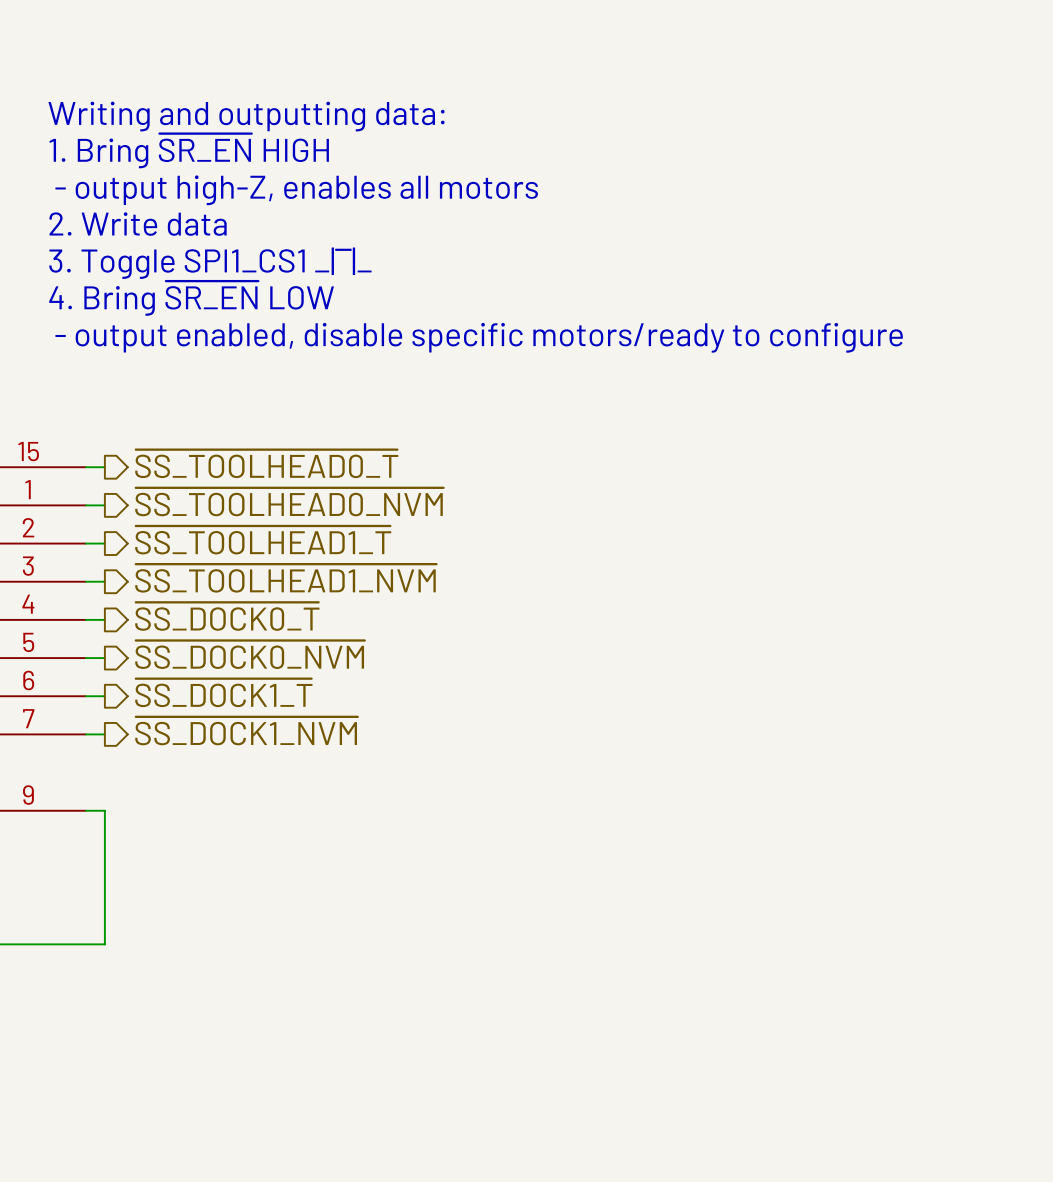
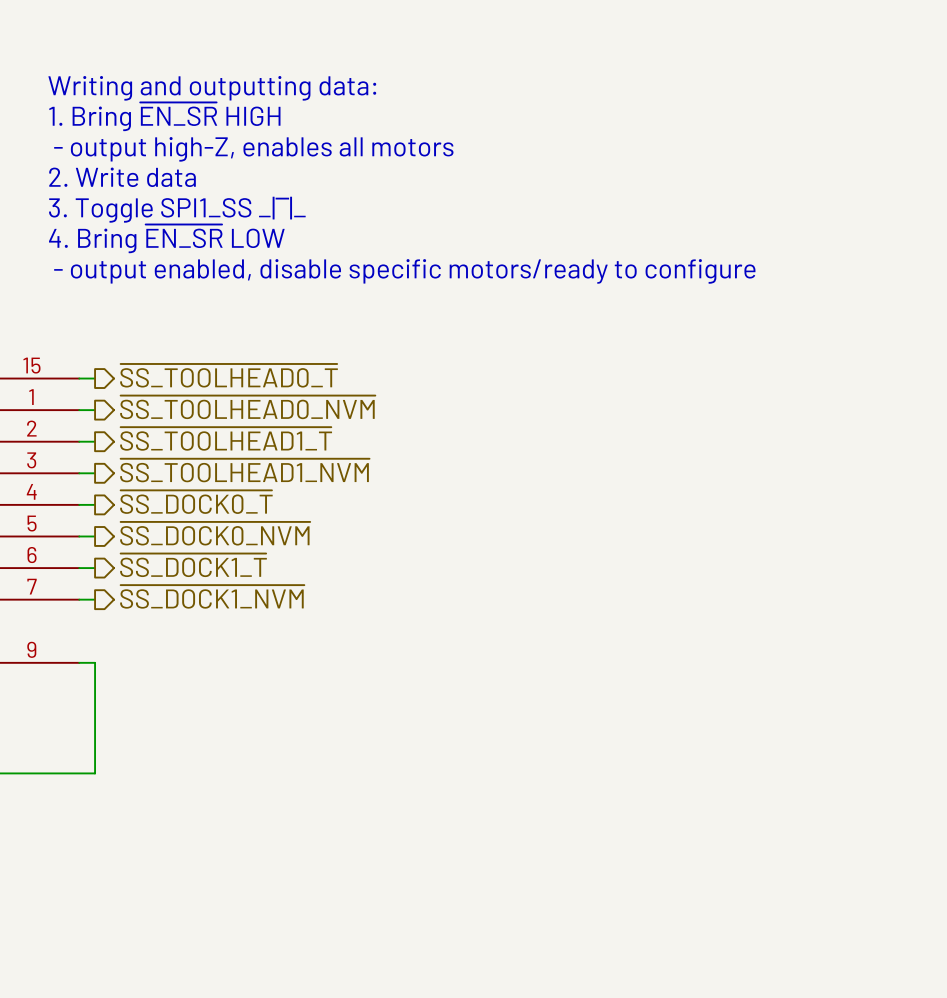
text: 1. Bring ~{SR_EN} HIGH (189, 150) -> 1. Bring ~{EN_SR} HIGH (164, 116)
text: 3. Toggle SPI1_CS1 _|‾|_ (210, 263) -> 3. Toggle SPI1_SS _|‾|_ (177, 209)
text: 4. Bring ~{SR_EN} LOW (191, 298) -> 4. Bring ~{EN_SR} LOW (166, 238)

